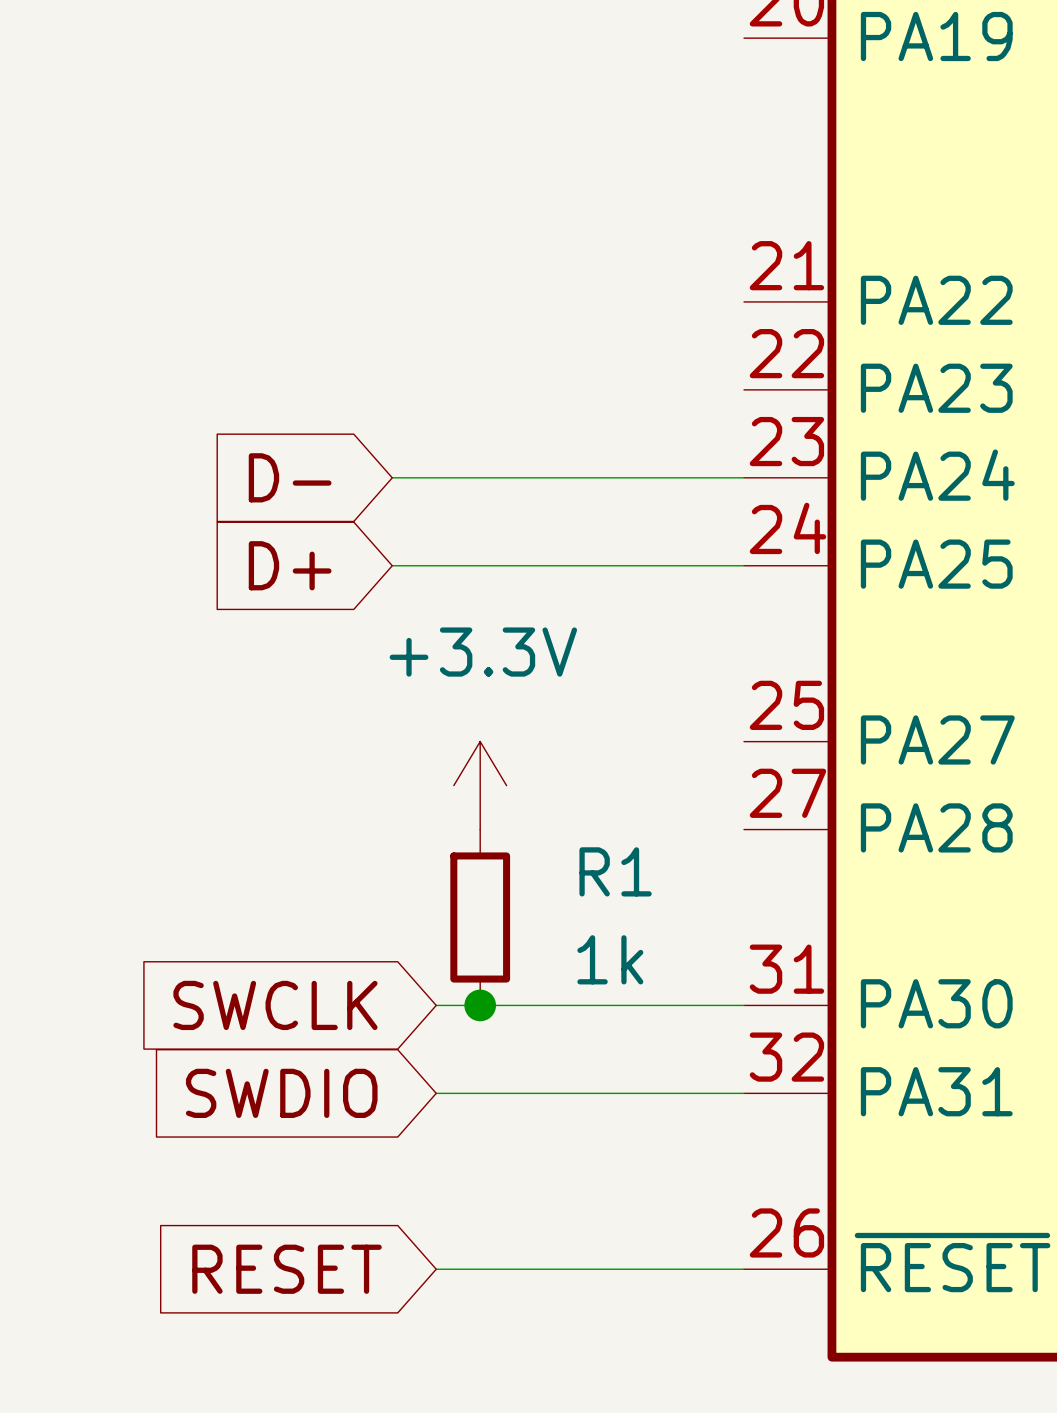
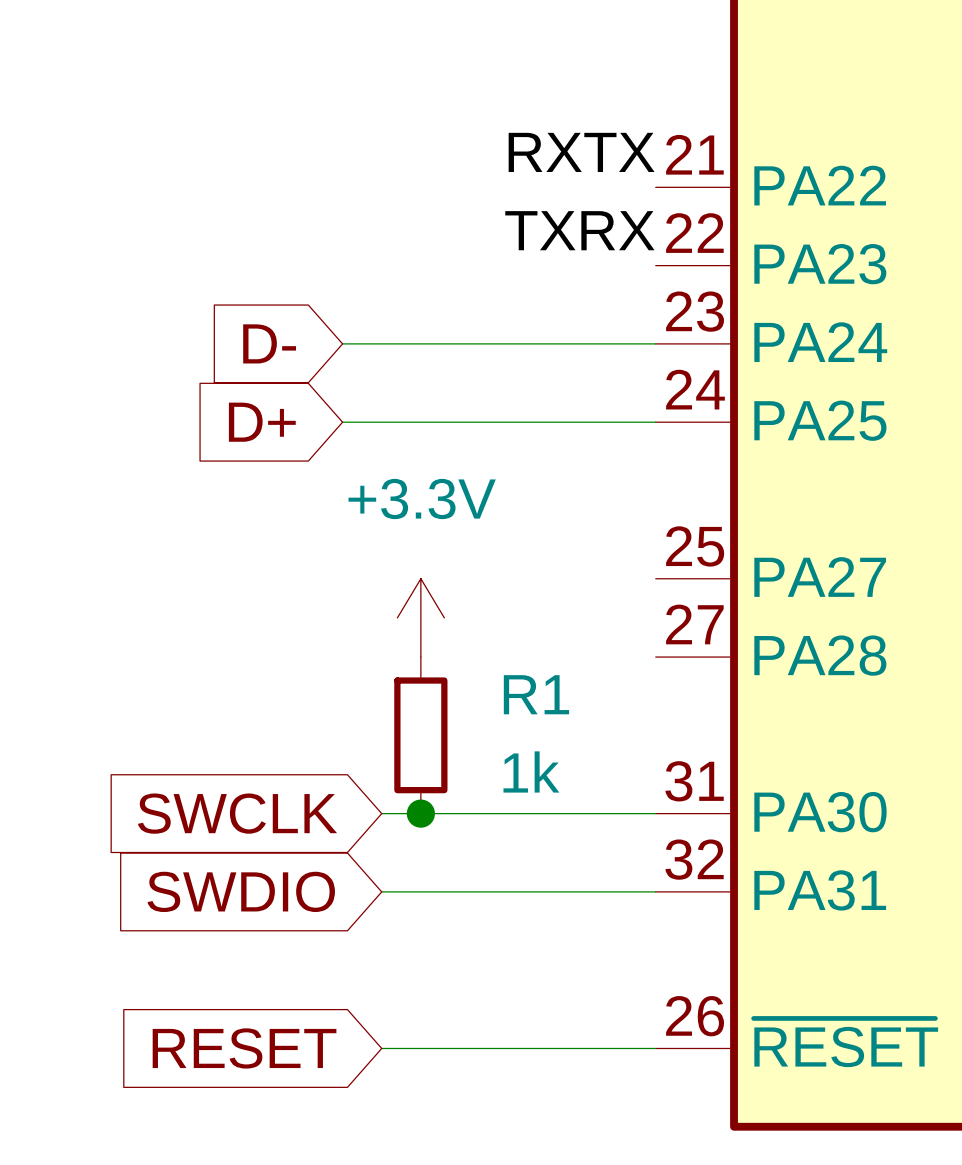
label: none -> RXTX (581, 152)
label: none -> TXRX (579, 230)

